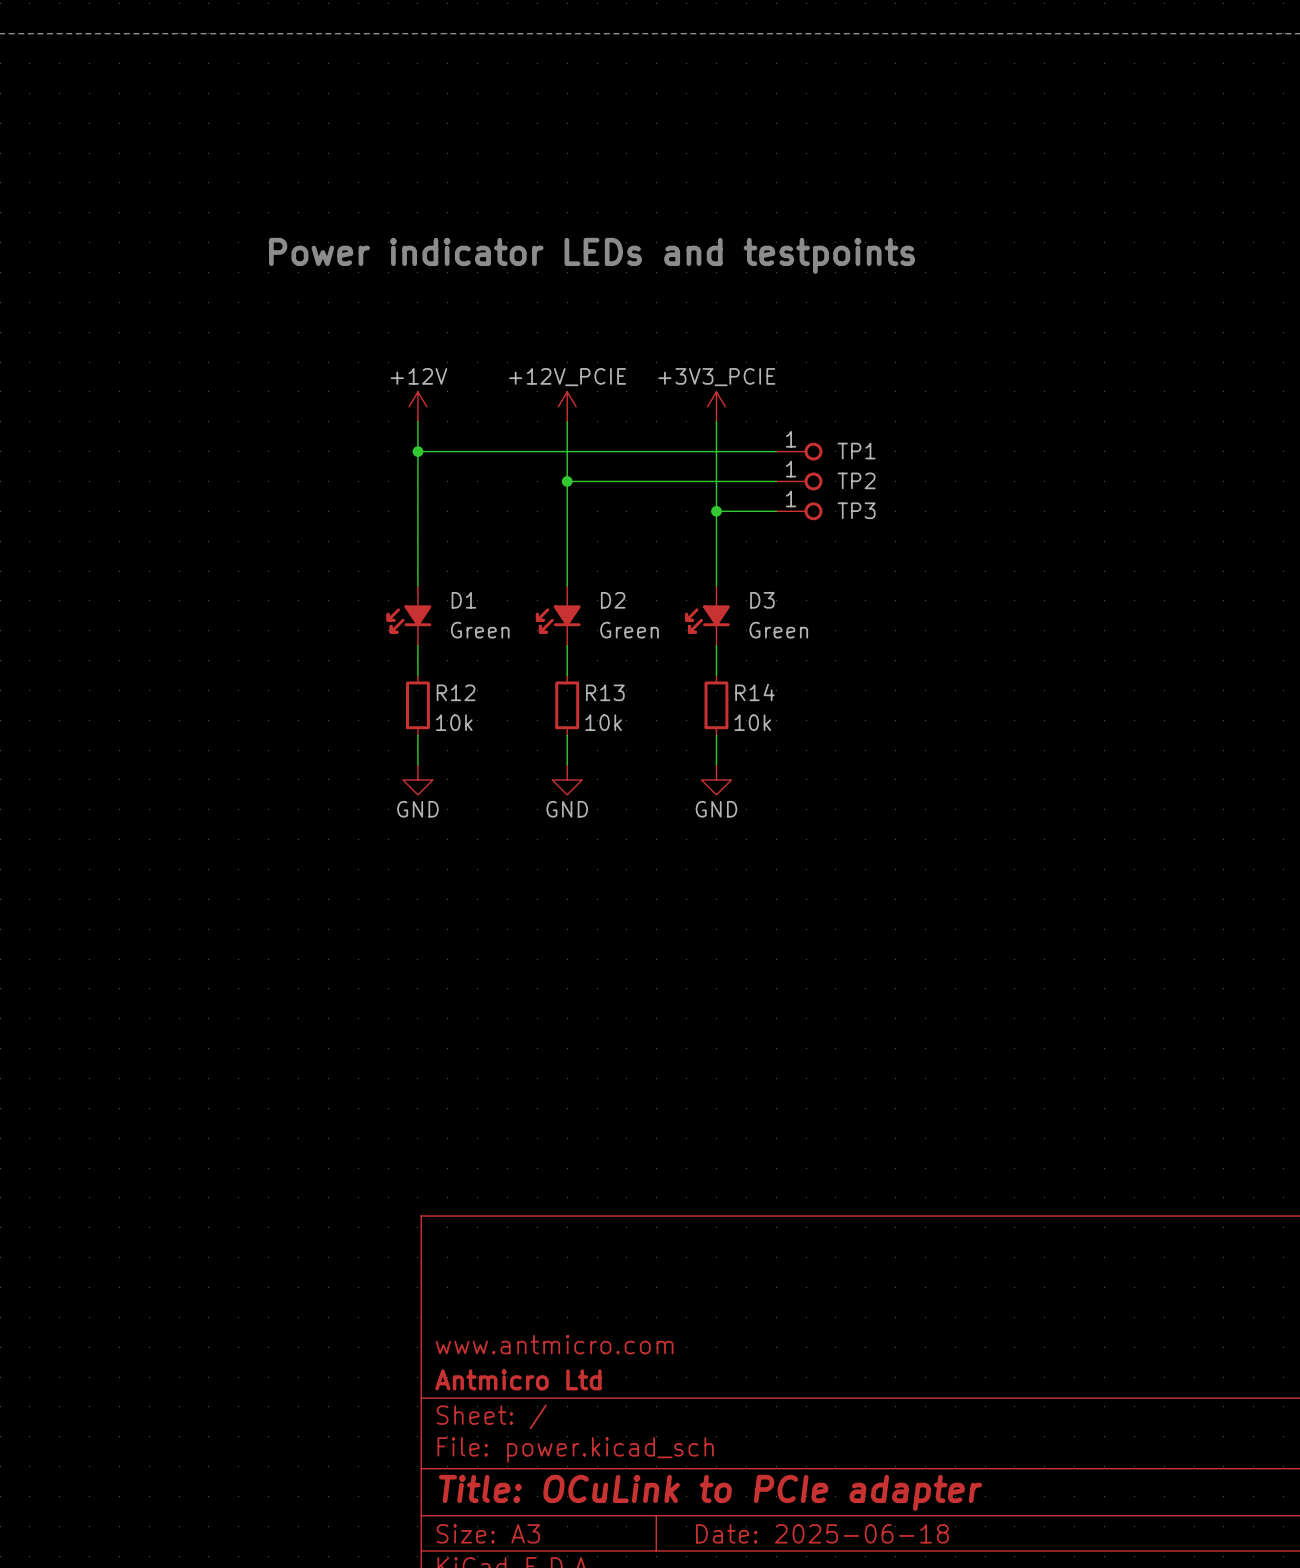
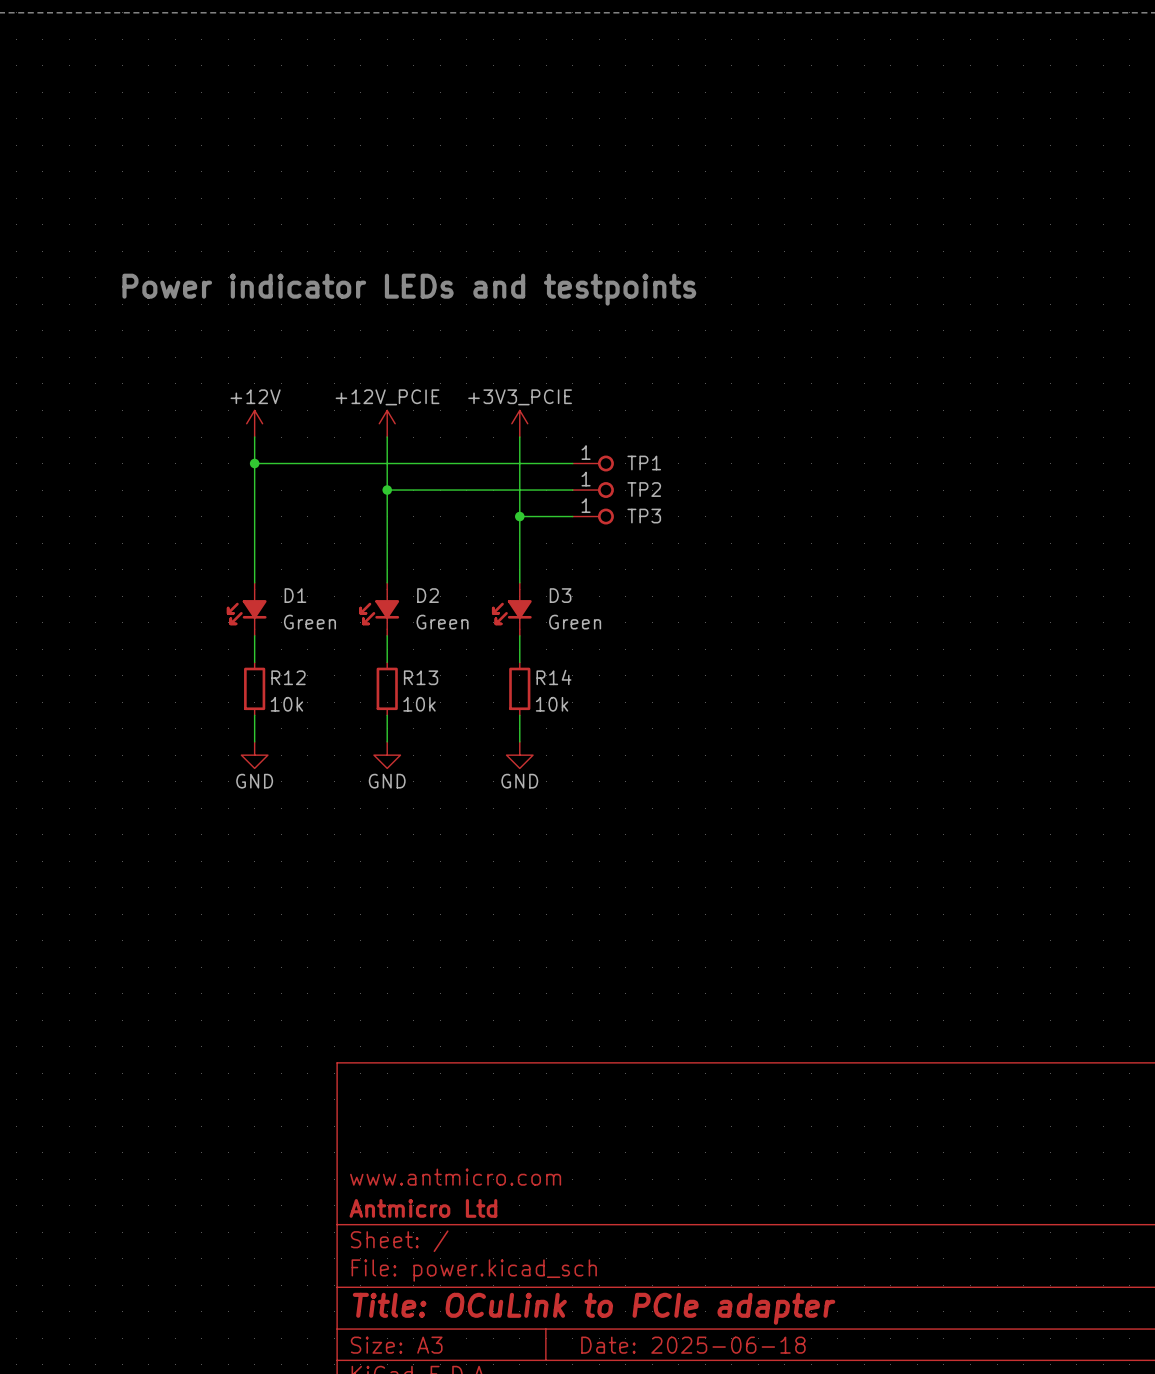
text position: Power indicator LEDs and testpoints (592, 255) -> Power indicator LEDs and testpoints (409, 289)
power symbol position: +12V (417, 406) -> +12V (254, 423)
power symbol position: +12V_PCIE (567, 406) -> +12V_PCIE (387, 423)
power symbol position: +3V3_PCIE (716, 406) -> +3V3_PCIE (519, 423)
wire: (417, 421) (417, 585) -> (254, 437) (254, 582)
wire: (567, 421) (567, 585) -> (387, 437) (387, 582)
wire: (716, 421) (716, 585) -> (519, 437) (519, 582)
wire: (417, 451) (776, 451) -> (254, 463) (572, 463)
junction: (417, 451) -> none
TP1 position: (799, 451) -> (593, 463)
wire: (567, 481) (776, 481) -> (387, 490) (572, 490)
junction: (567, 481) -> none
TP2 position: (799, 481) -> (593, 490)
wire: (716, 511) (776, 511) -> (519, 516) (572, 516)
junction: (716, 511) -> none
TP3 position: (799, 511) -> (593, 516)
junction: none -> (254, 463)
junction: none -> (387, 490)
junction: none -> (519, 516)
D1 position: (408, 615) -> (246, 609)
D2 position: (558, 615) -> (379, 609)
D3 position: (707, 615) -> (511, 609)
wire: (417, 645) (417, 675) -> (254, 635) (254, 662)
wire: (567, 645) (567, 675) -> (387, 635) (387, 662)
wire: (716, 645) (716, 675) -> (519, 635) (519, 662)
R12 position: (417, 705) -> (254, 688)
R13 position: (567, 705) -> (387, 688)
R14 position: (716, 705) -> (519, 688)
wire: (417, 735) (417, 765) -> (254, 715) (254, 741)
wire: (567, 735) (567, 765) -> (387, 715) (387, 741)
wire: (716, 735) (716, 765) -> (519, 715) (519, 741)
power symbol: GND (417, 779) -> none
power symbol: GND (567, 779) -> none
power symbol: GND (716, 779) -> none
power symbol: none -> GND (254, 755)
power symbol: none -> GND (387, 755)
power symbol: none -> GND (519, 755)

